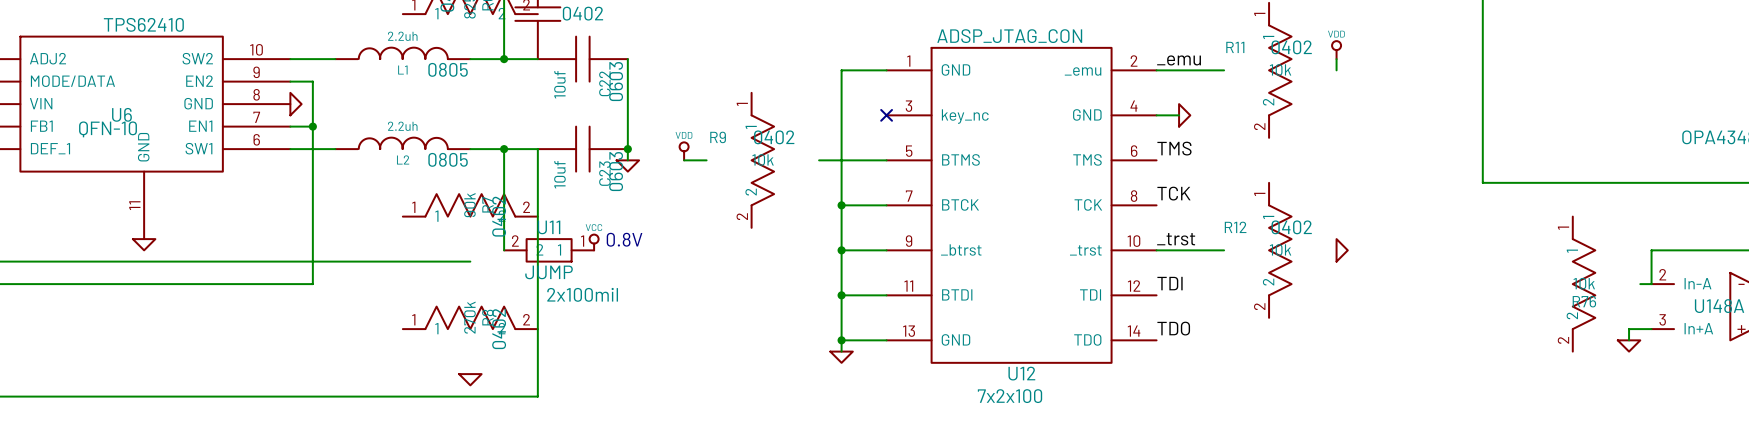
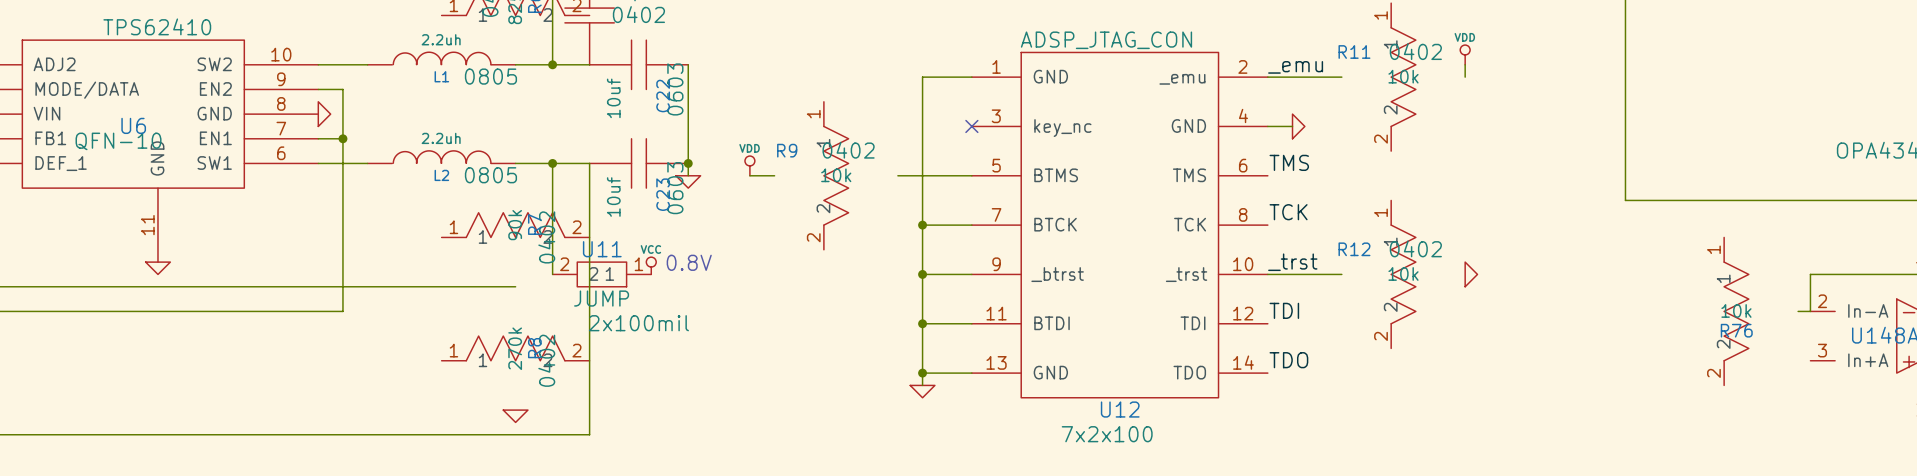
wire: (1651, 329) (1629, 329) (1629, 340) -> none
power symbol: (1629, 345) -> none

